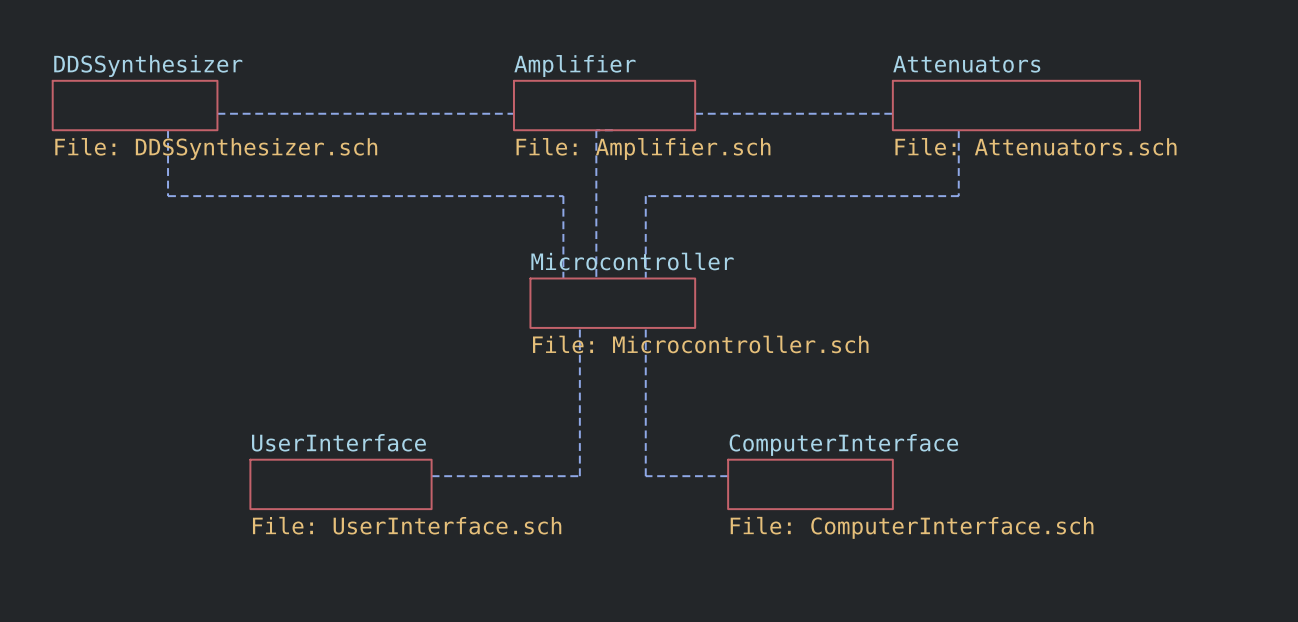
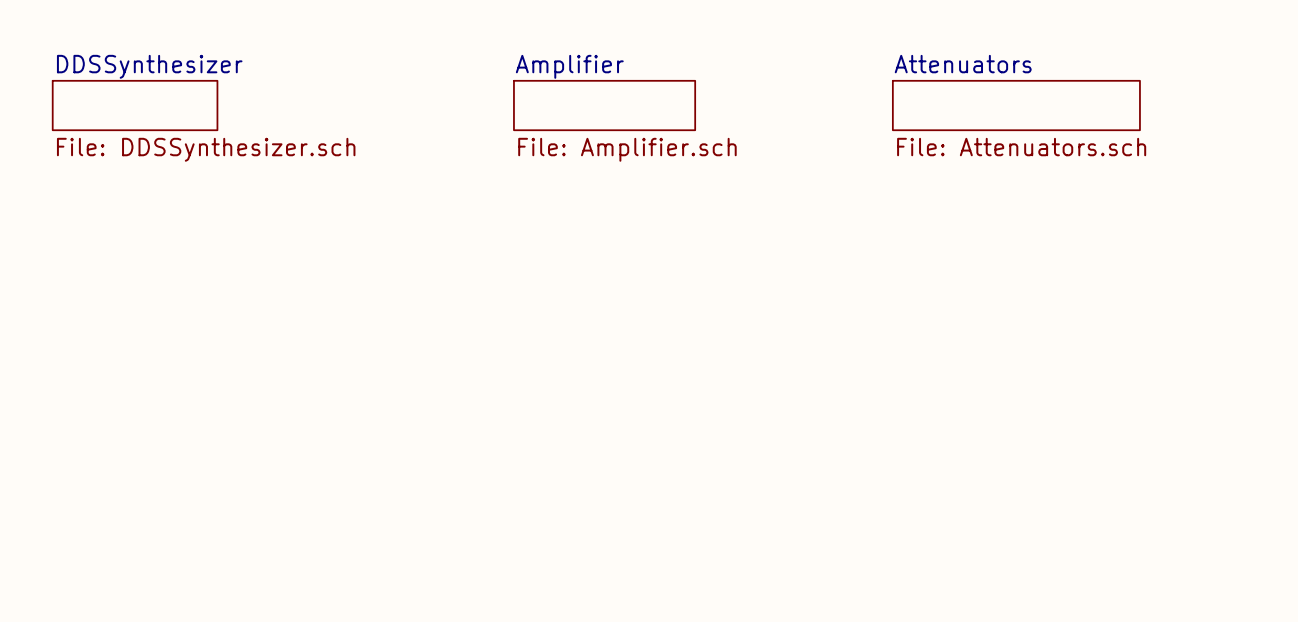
line: (217, 113) (513, 113) -> none
line: (695, 113) (892, 113) -> none
line: (168, 130) (168, 196) (563, 196) (563, 278) -> none
line: (612, 130) (596, 130) (596, 278) -> none
line: (958, 130) (958, 196) (645, 196) (645, 278) -> none
sheet Microcontroller: File: Microcontroller.sch (612, 303) -> none
line: (579, 327) (579, 476) (431, 476) -> none
line: (645, 327) (645, 476) (728, 476) -> none
sheet UserInterface: File: UserInterface.sch (340, 484) -> none
sheet ComputerInterface: File: ComputerInterface.sch (810, 484) -> none

